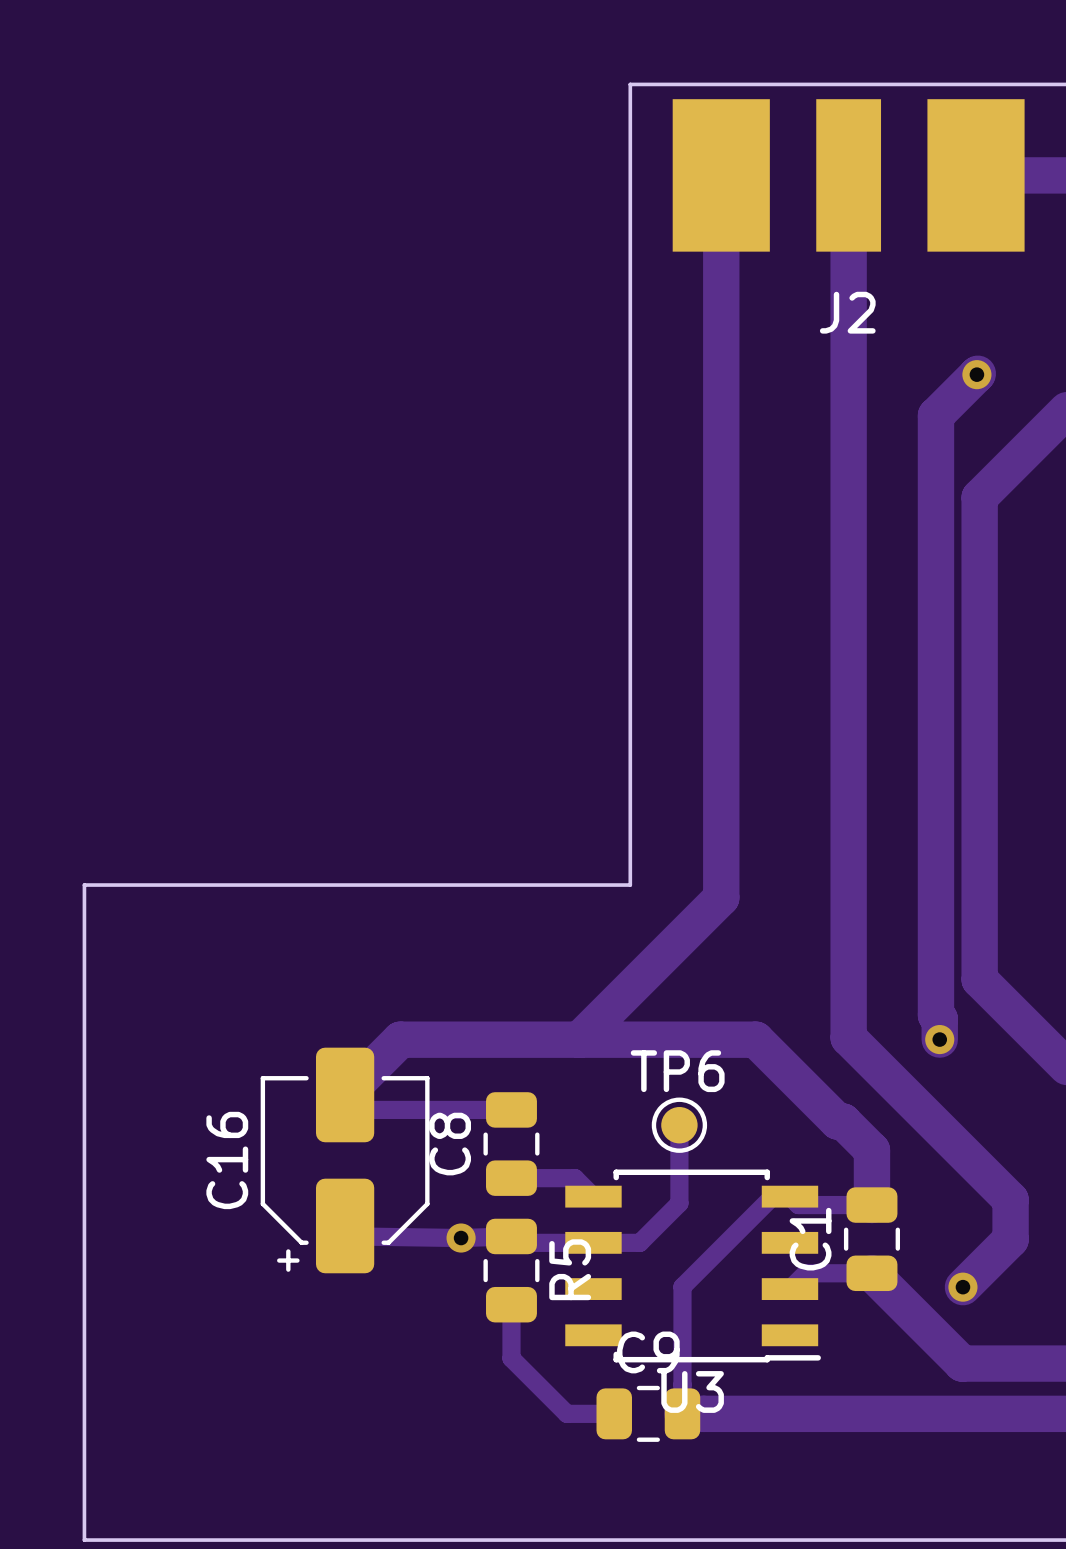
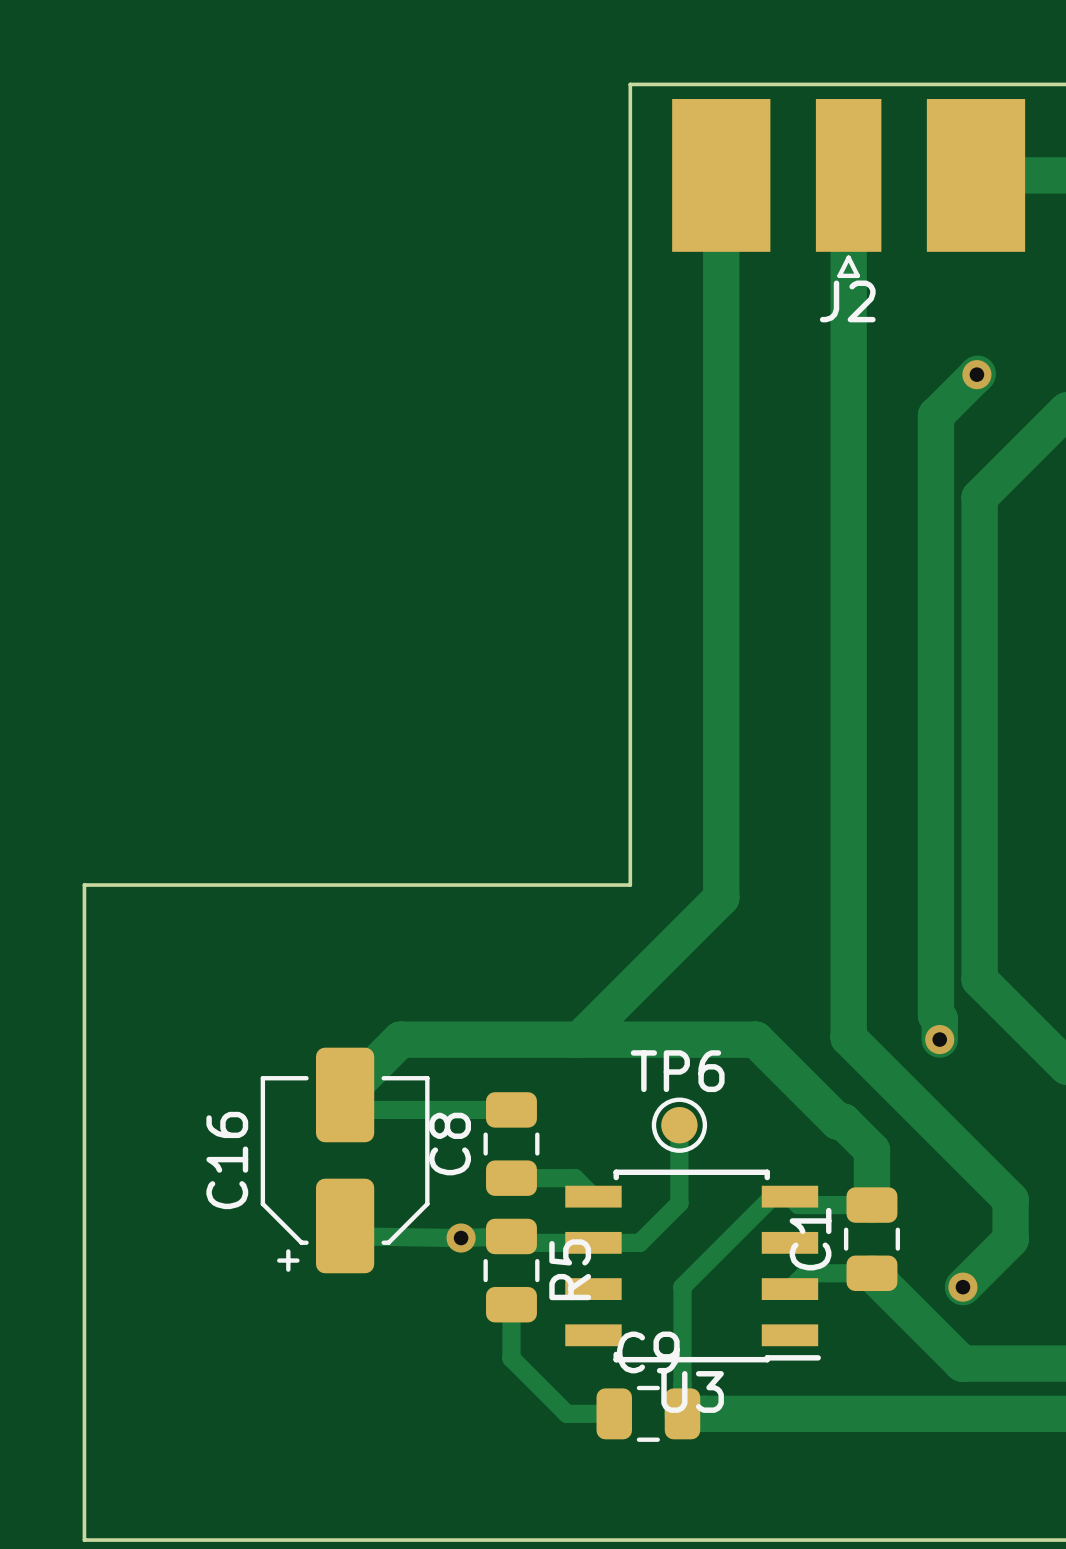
J2 footprint: [672, 99, 1025, 252] -> [672, 98, 1026, 279]

